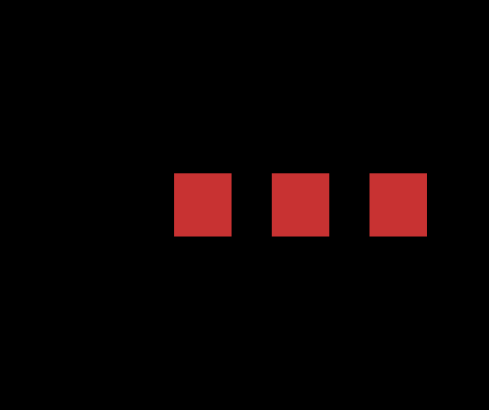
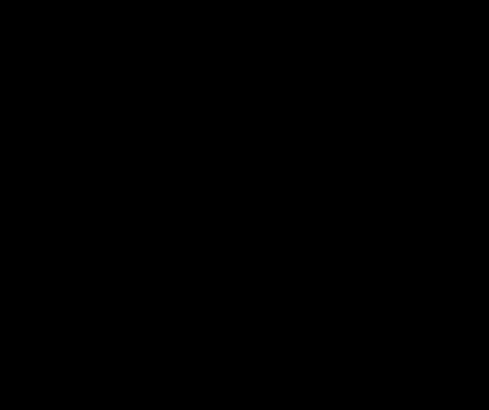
part: (300, 204) -> none

